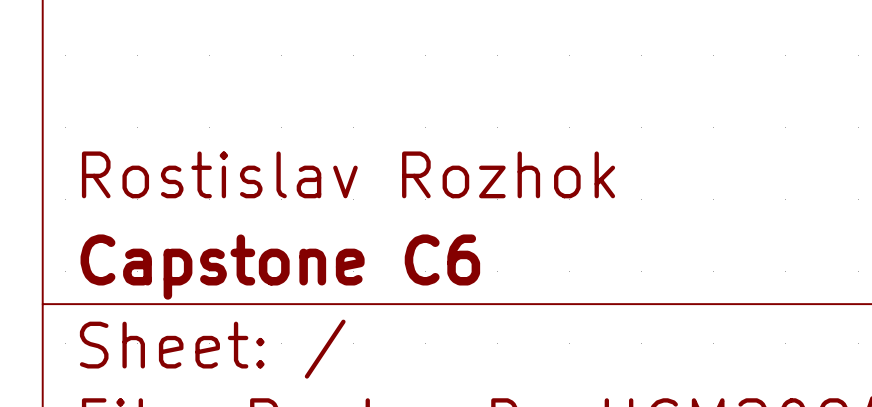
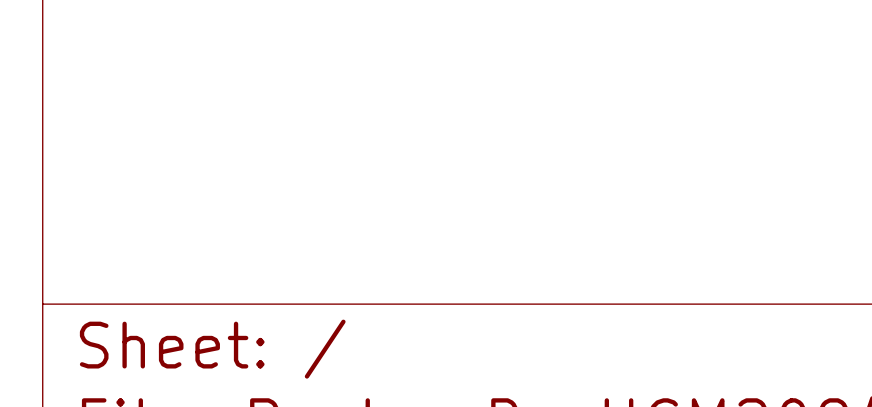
title block: Rostislav Rozhok (348, 174) -> none
title block: Capstone C6 (280, 267) -> none

